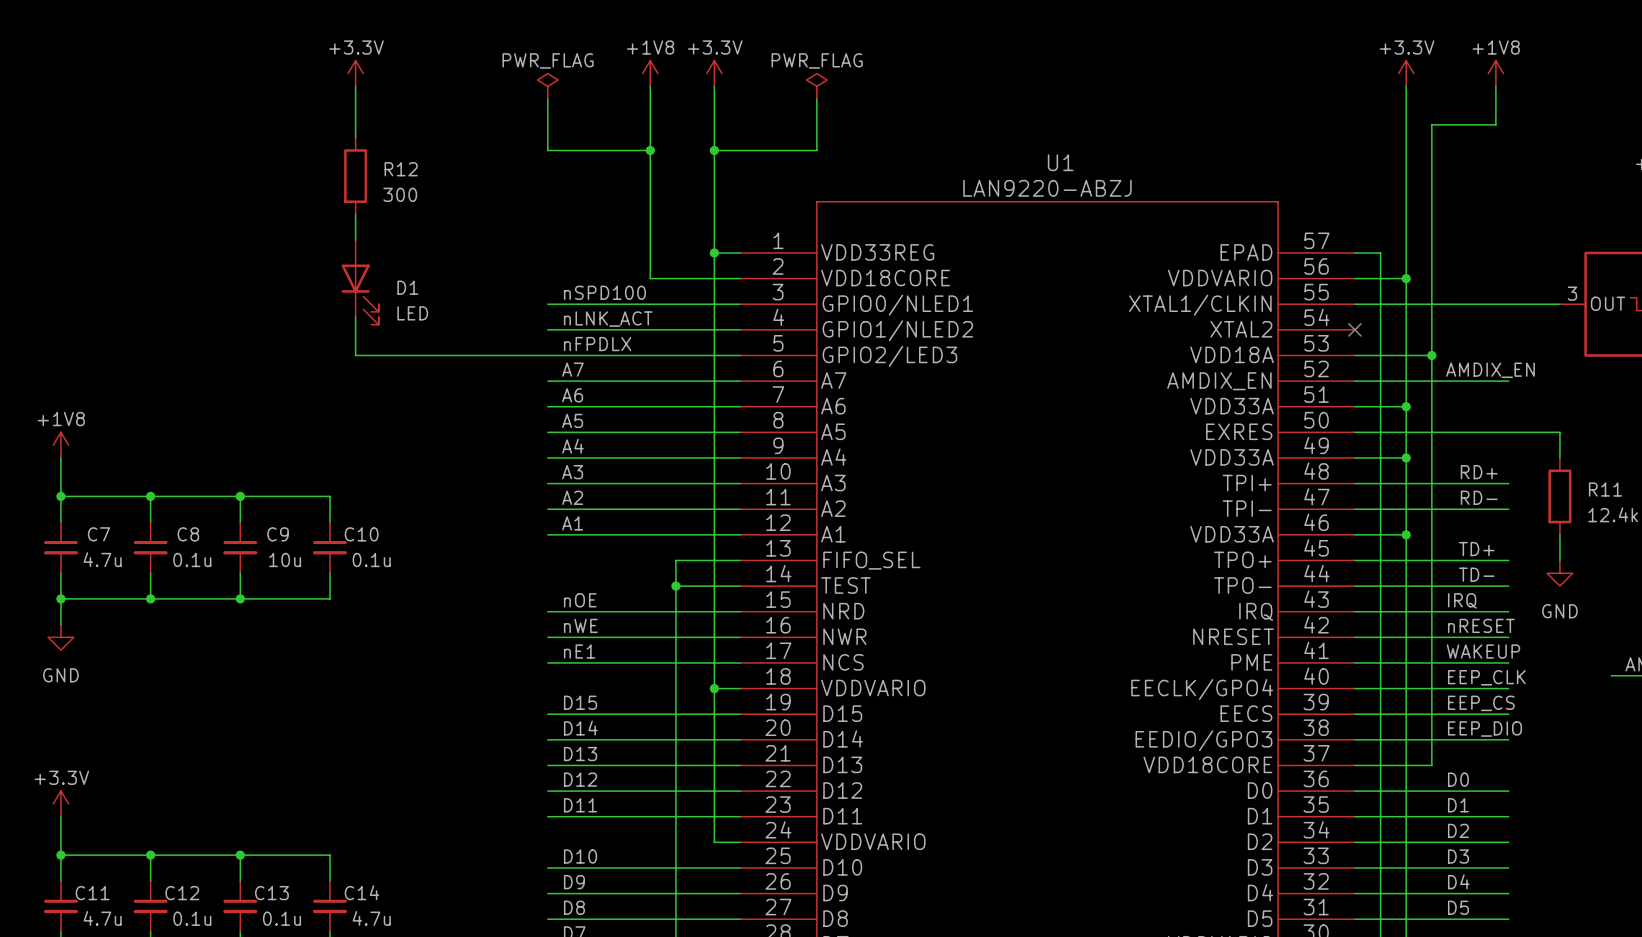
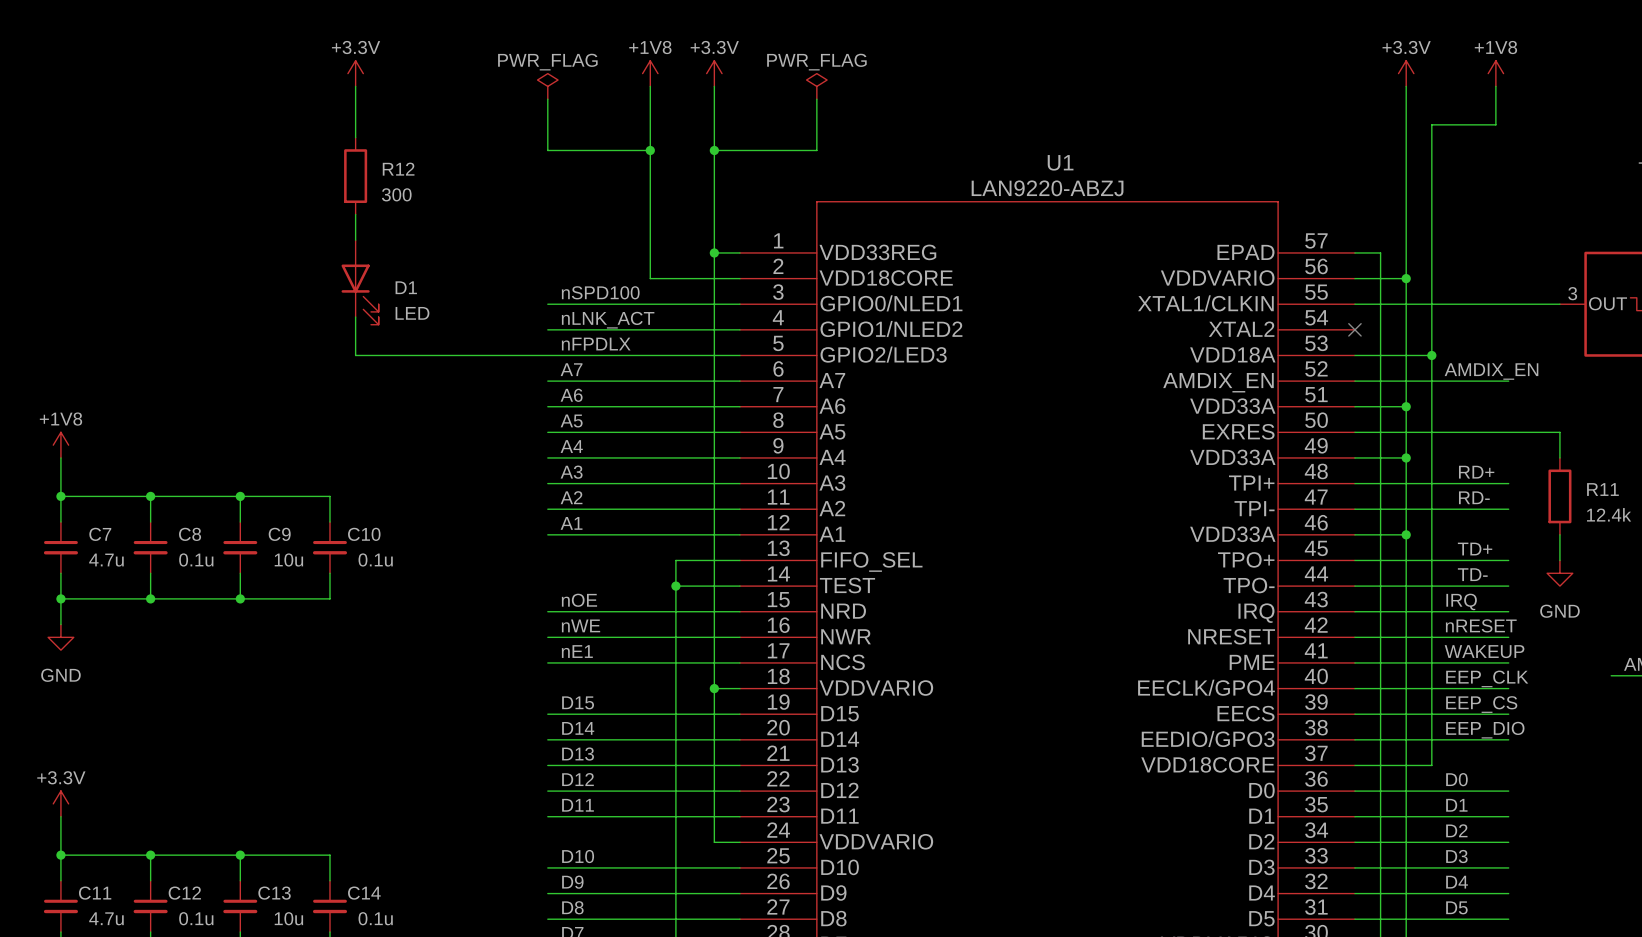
C13 value: 0.1u (282, 918) -> 10u (288, 918)
C14 value: 4.7u (371, 918) -> 0.1u (375, 918)

